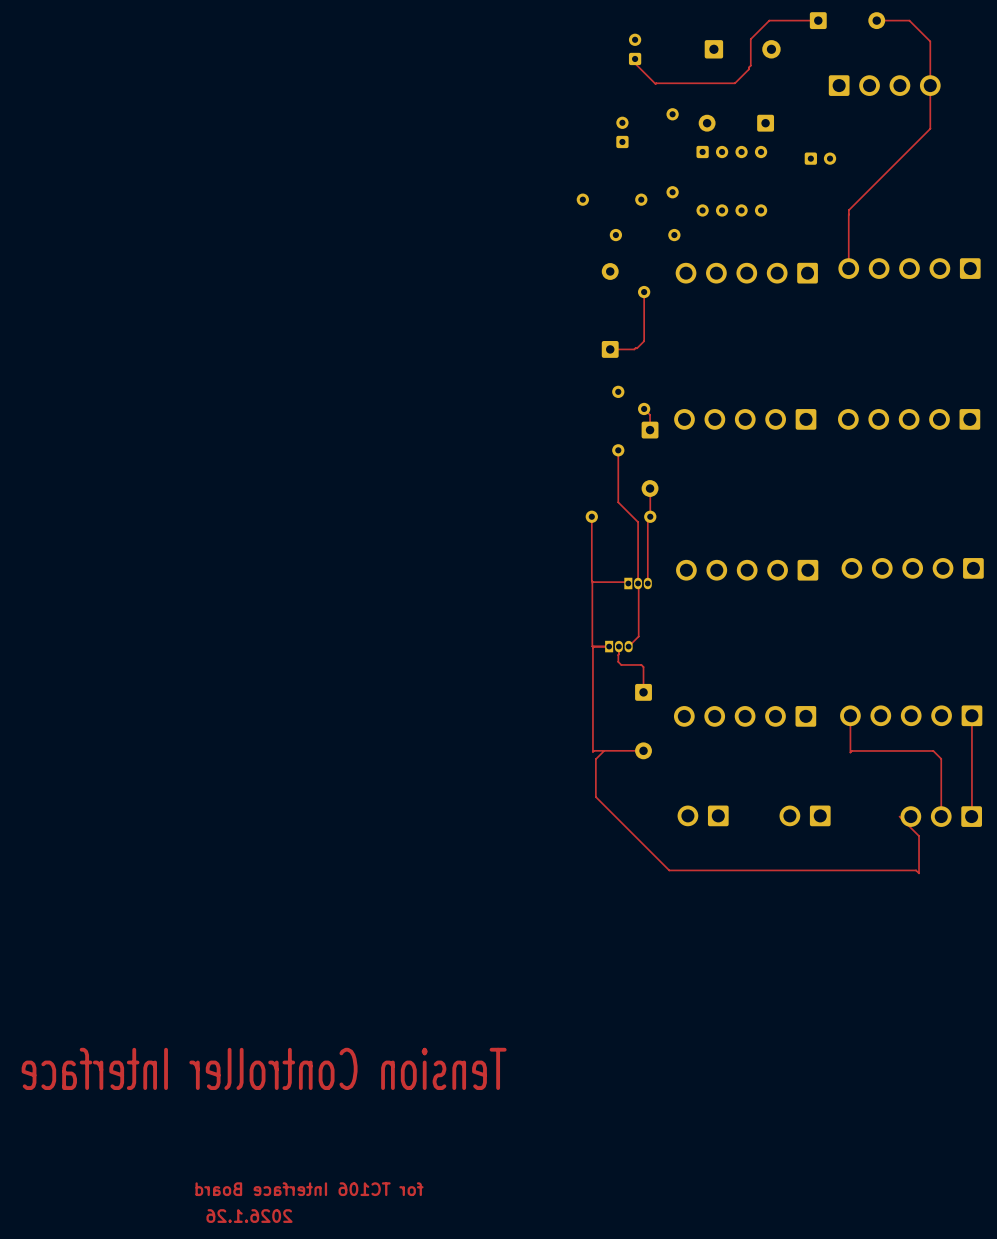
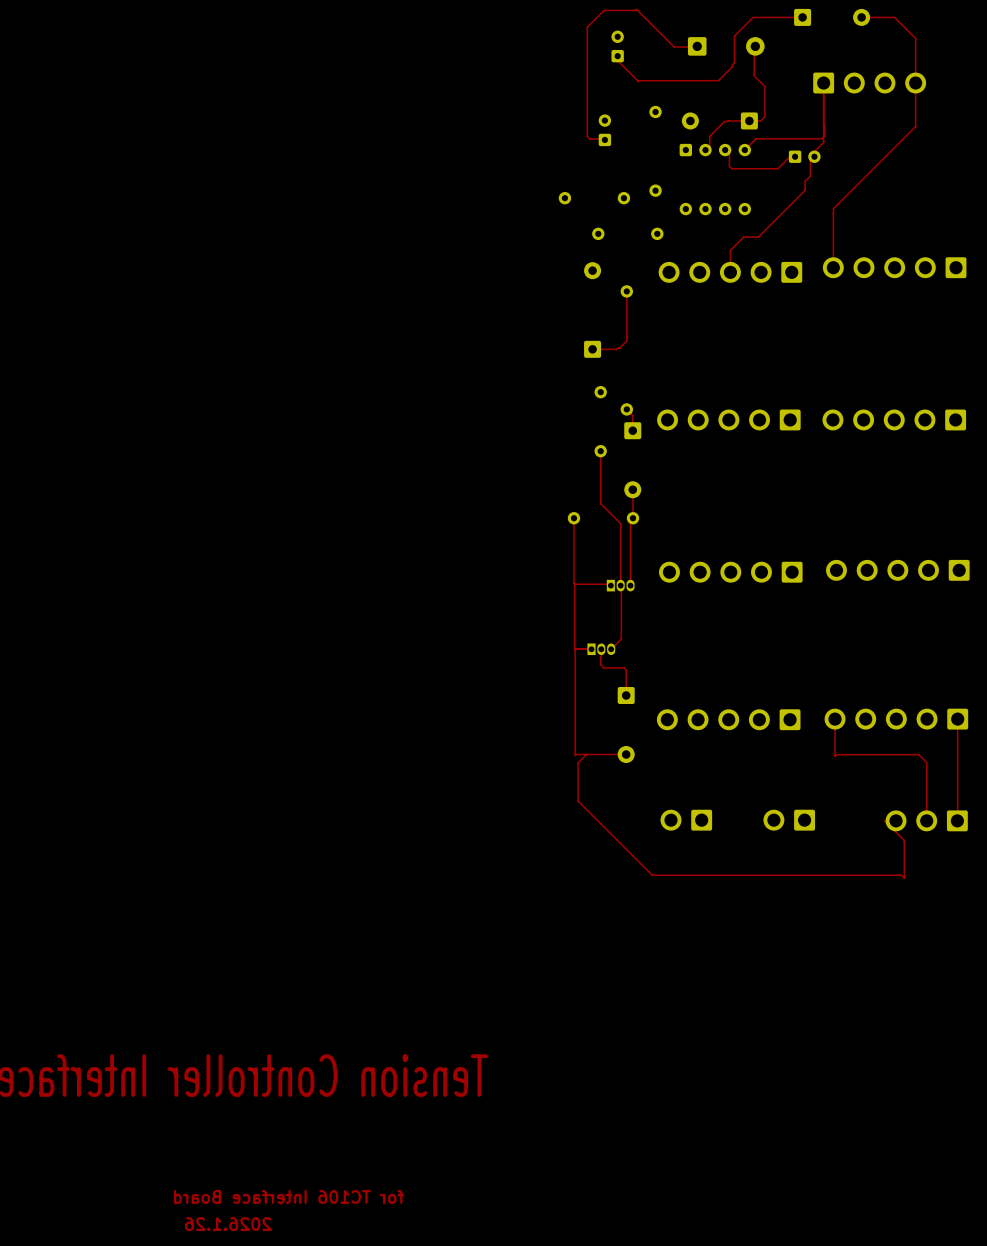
top track: none -> (696, 47) (674, 47) (636, 9) (604, 10) (587, 27) (587, 136) (590, 139) (604, 138)
top track: none -> (754, 47) (754, 75) (764, 86) (764, 116) (760, 120) (724, 121) (709, 136) (709, 151)
top track: none -> (823, 83) (823, 142) (810, 155) (810, 176) (805, 181) (805, 190) (758, 237) (743, 237) (730, 250) (730, 272)
top track: none -> (823, 124) (824, 135) (821, 138) (756, 138) (744, 150)
top track: none -> (725, 155) (729, 151) (729, 166) (731, 168) (777, 168) (790, 155)

